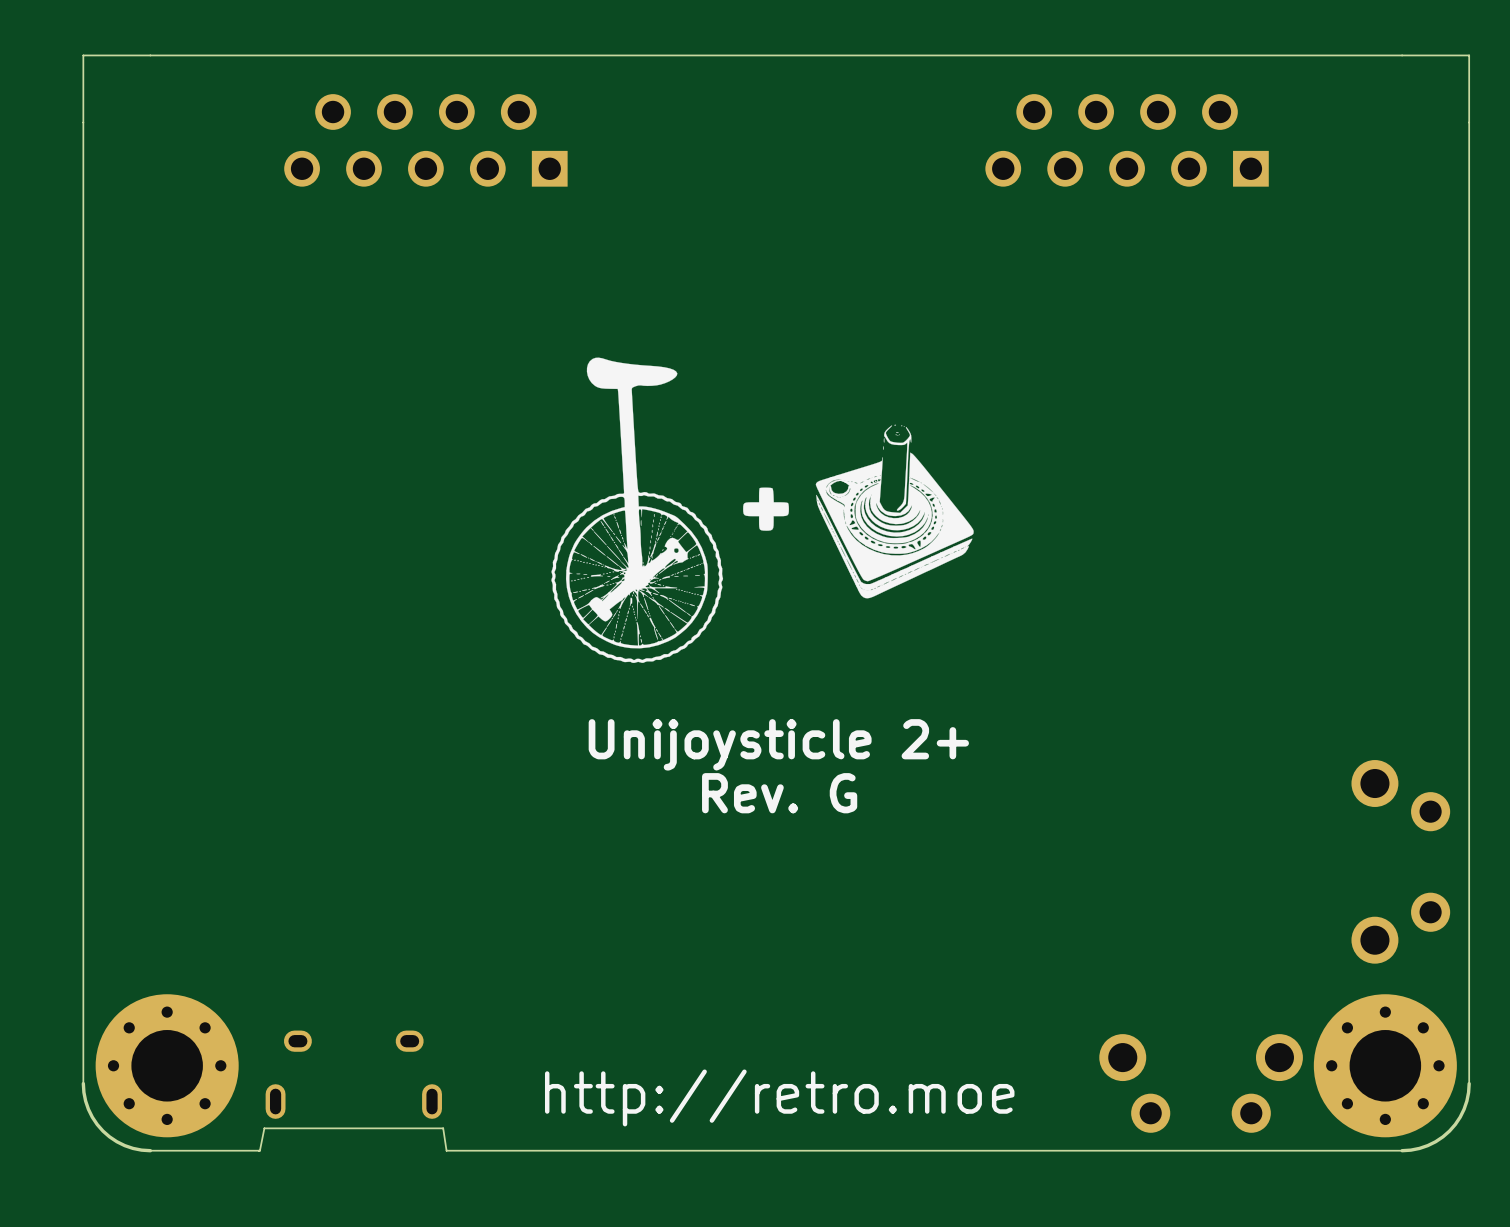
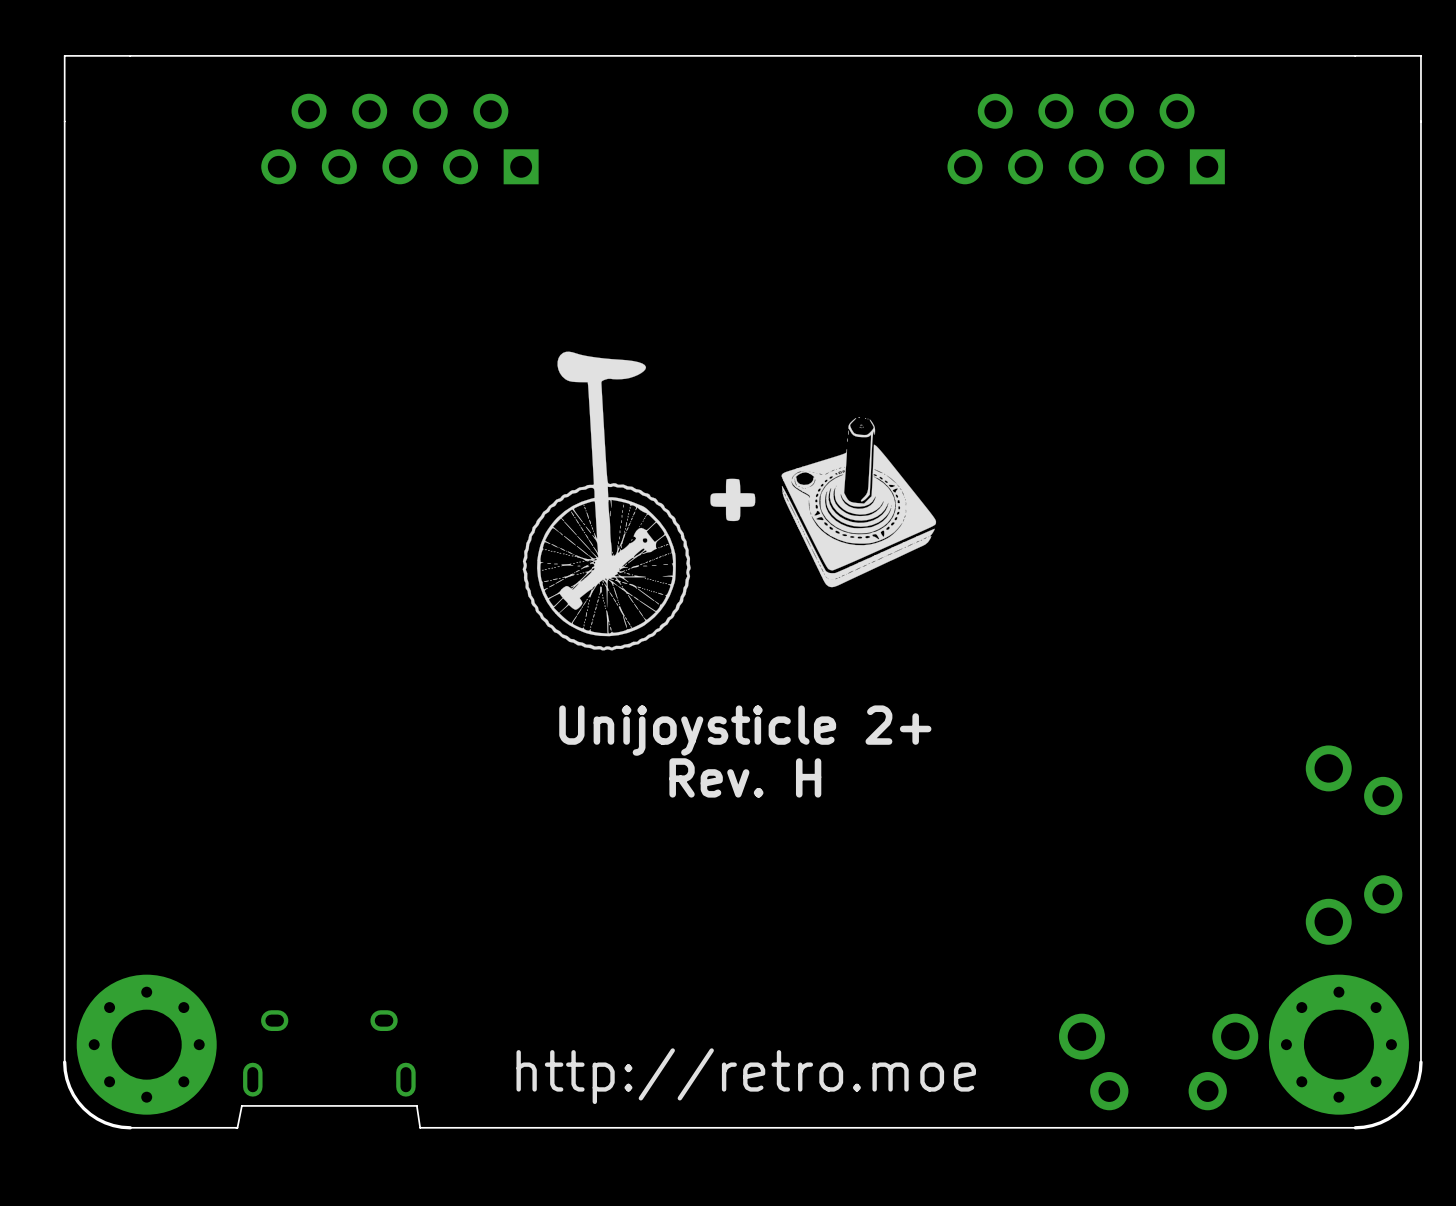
text: Rev. G (779, 793) -> Rev. H (745, 777)

